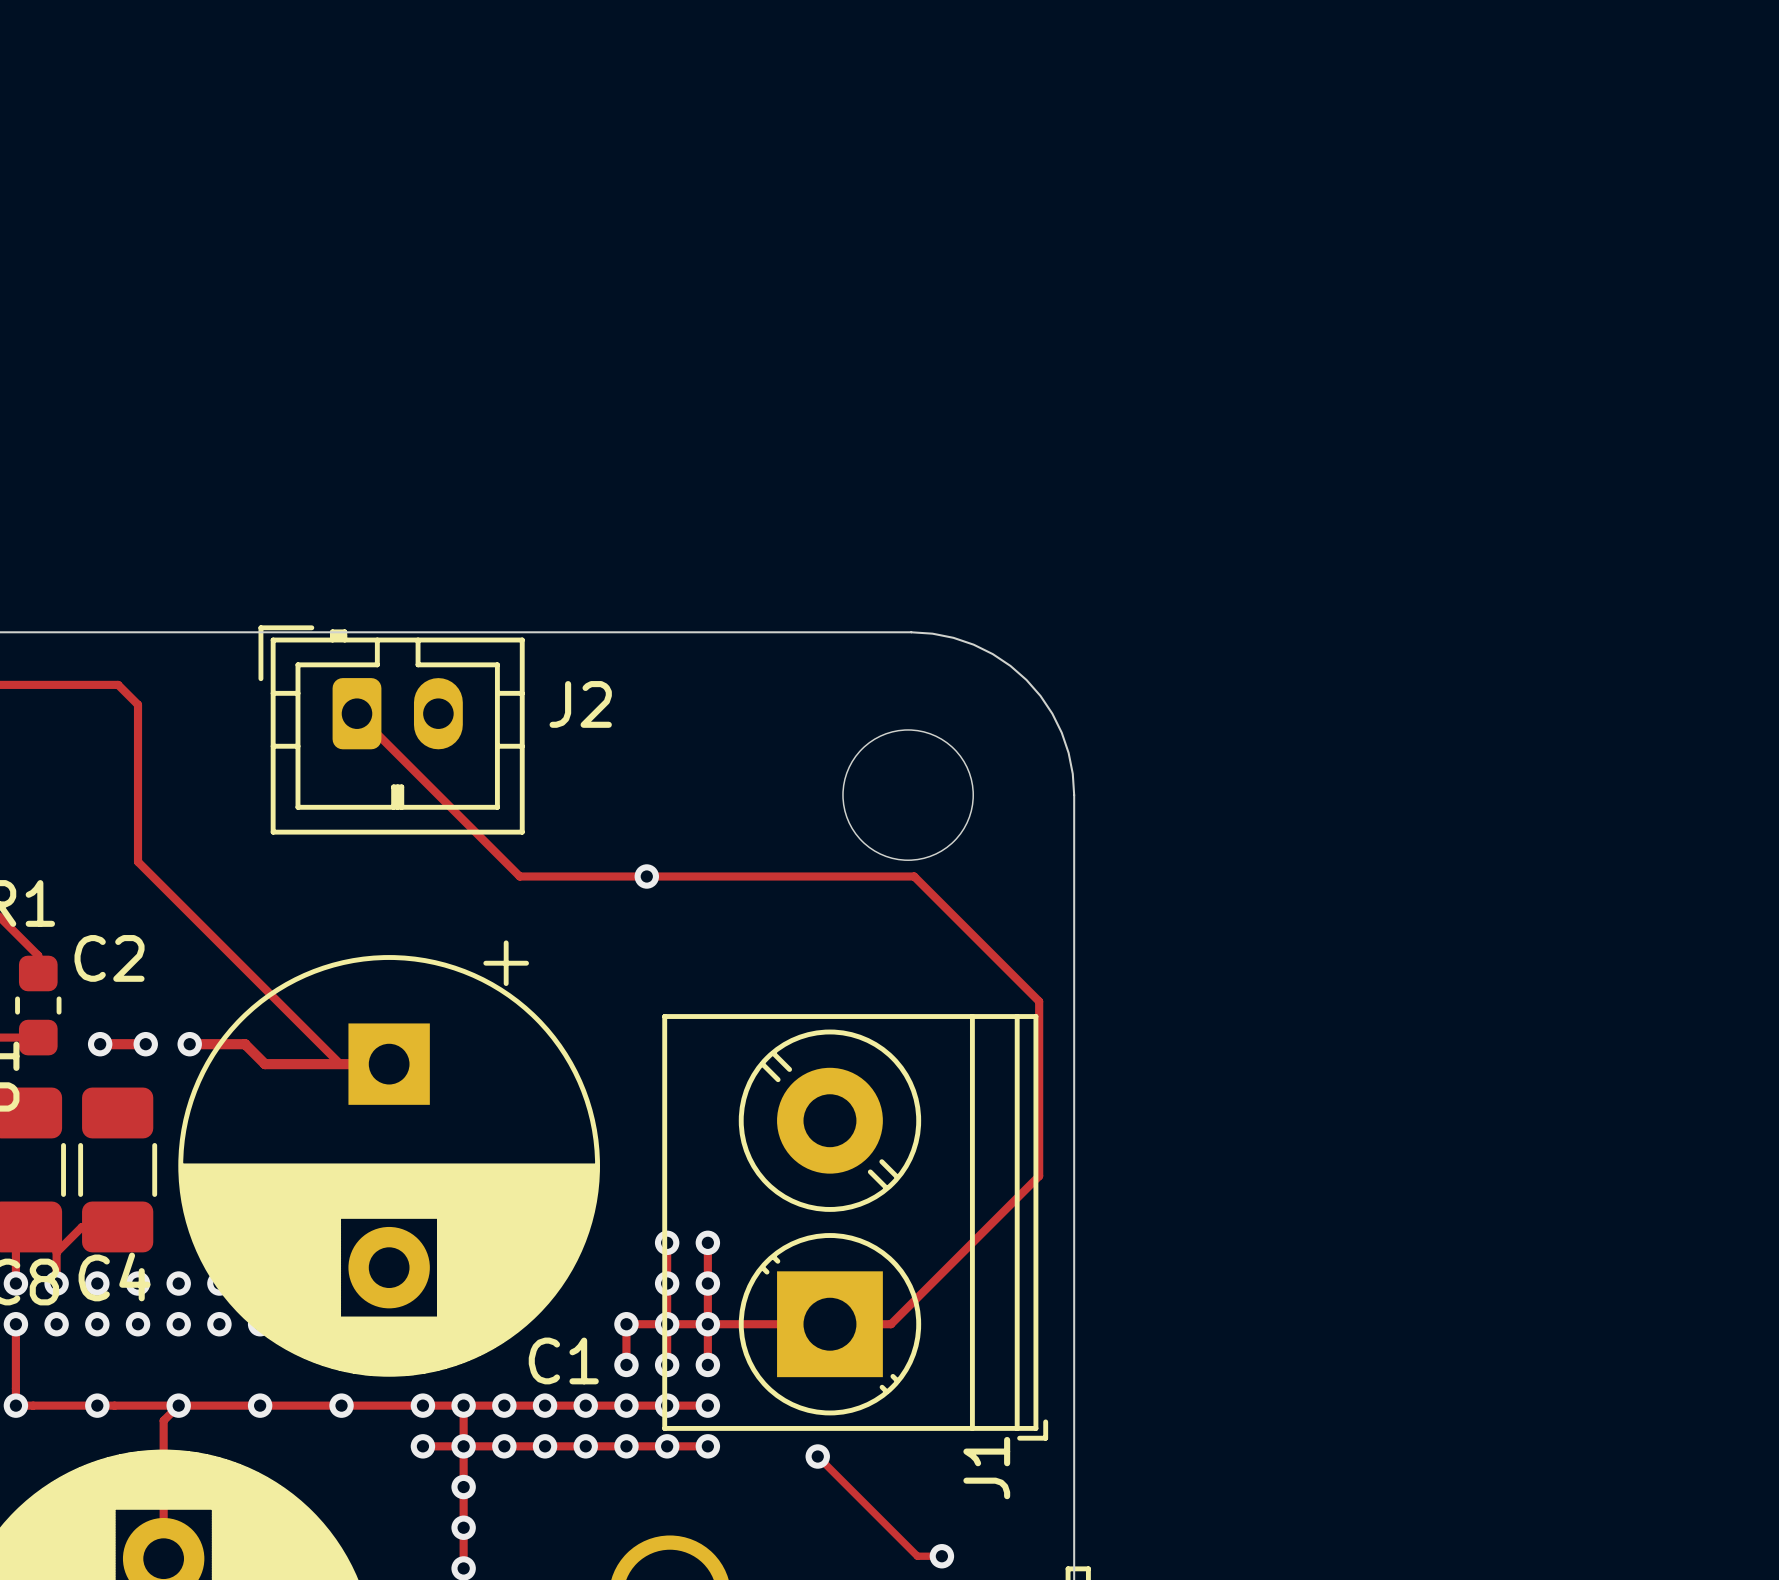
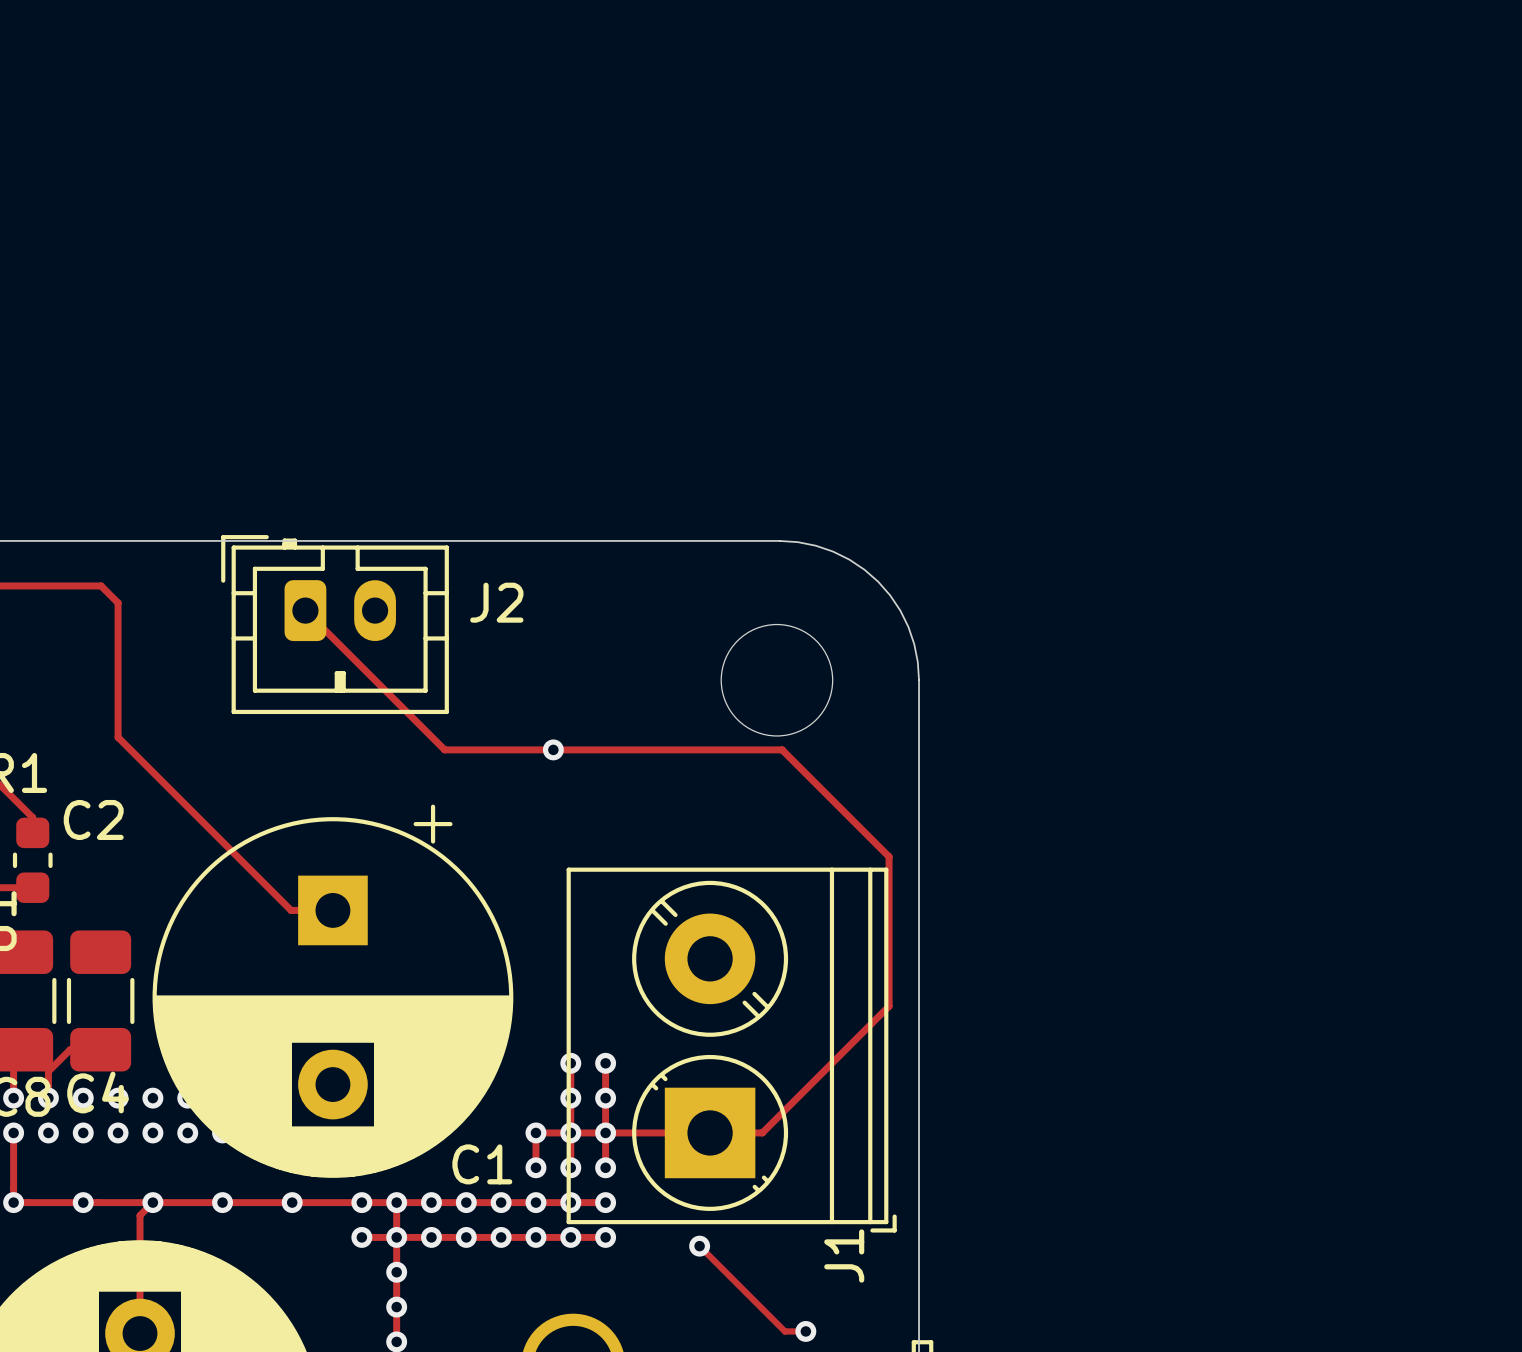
track: (100, 1044) (145, 1044) -> none
via: (100, 1044) -> none
via: (145, 1044) -> none
track: (189, 1044) (245, 1044) (265, 1064) (389, 1064) -> none
via: (189, 1044) -> none

